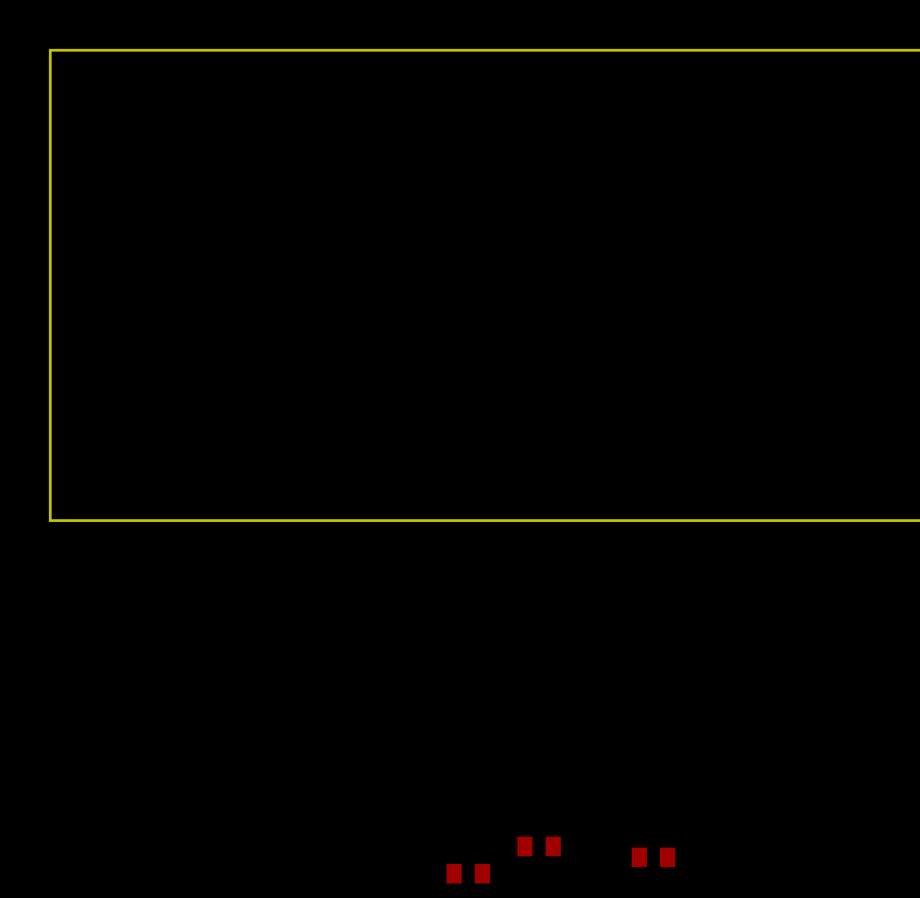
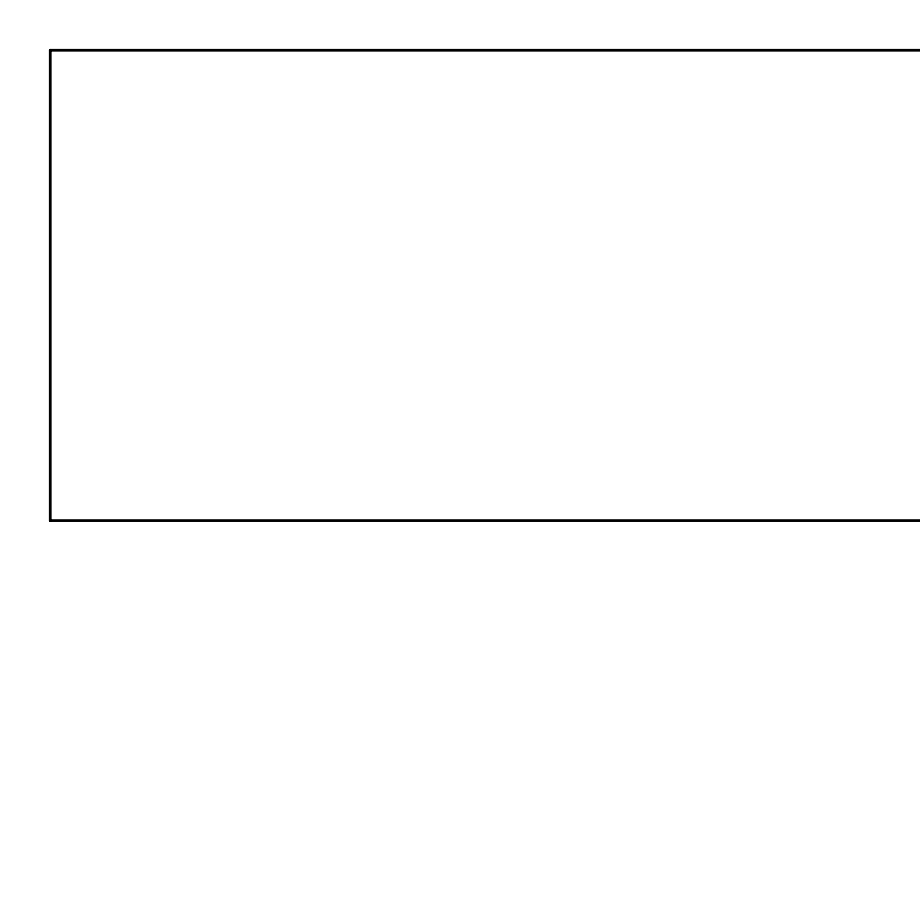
part: (539, 846) -> none
part: (653, 857) -> none
part: (468, 873) -> none

